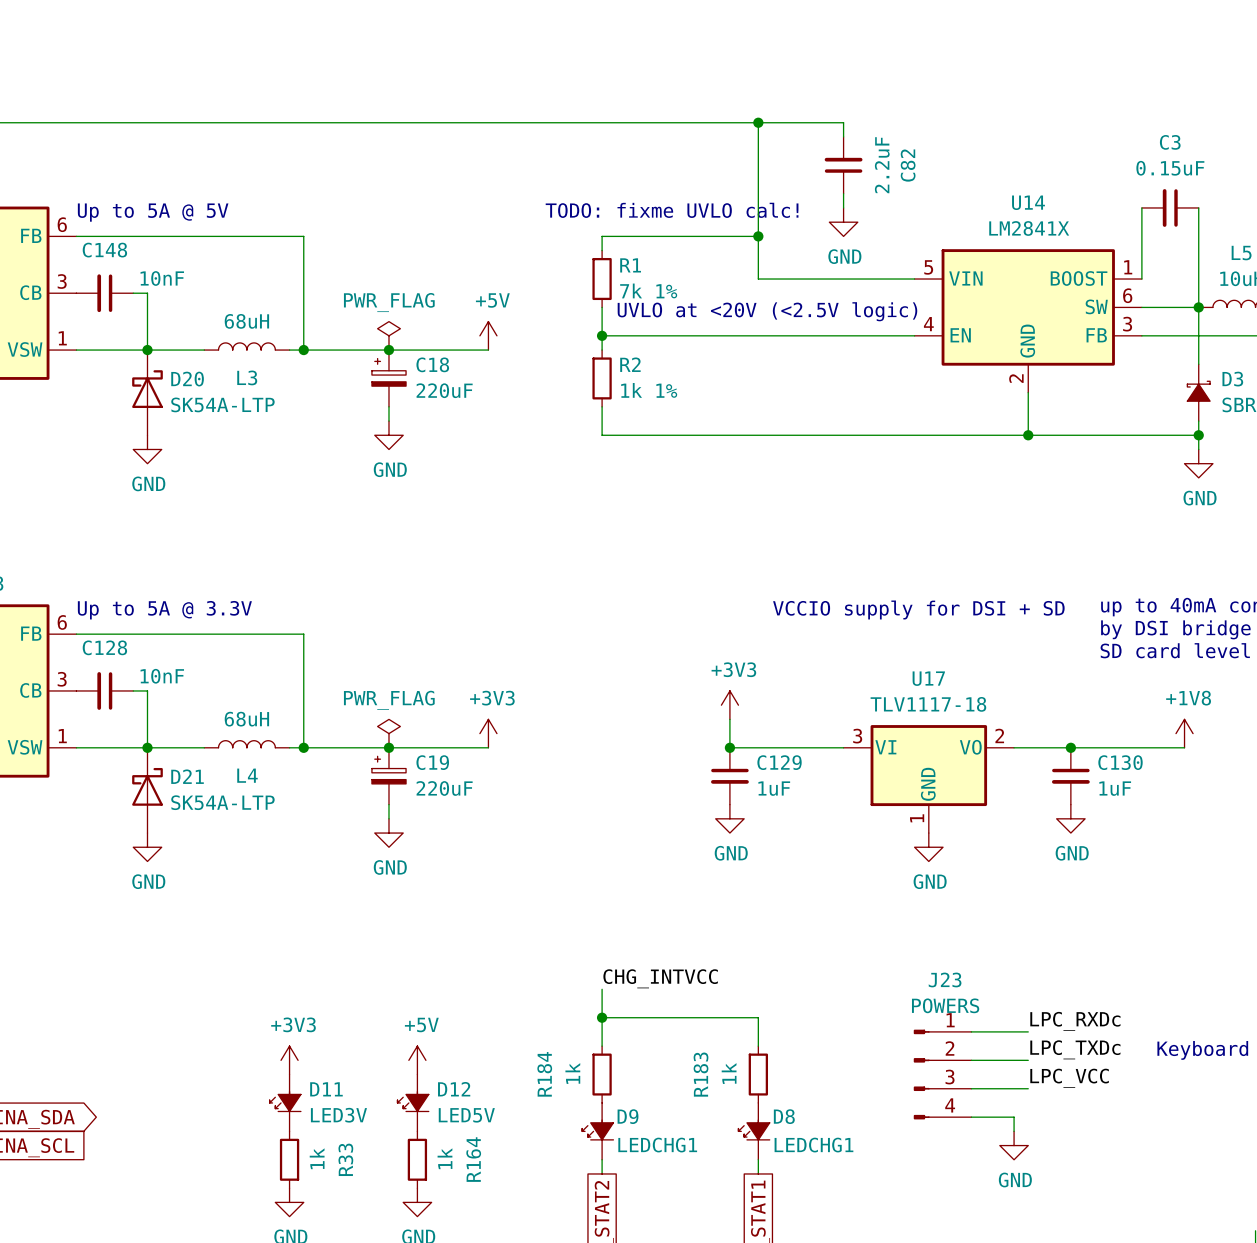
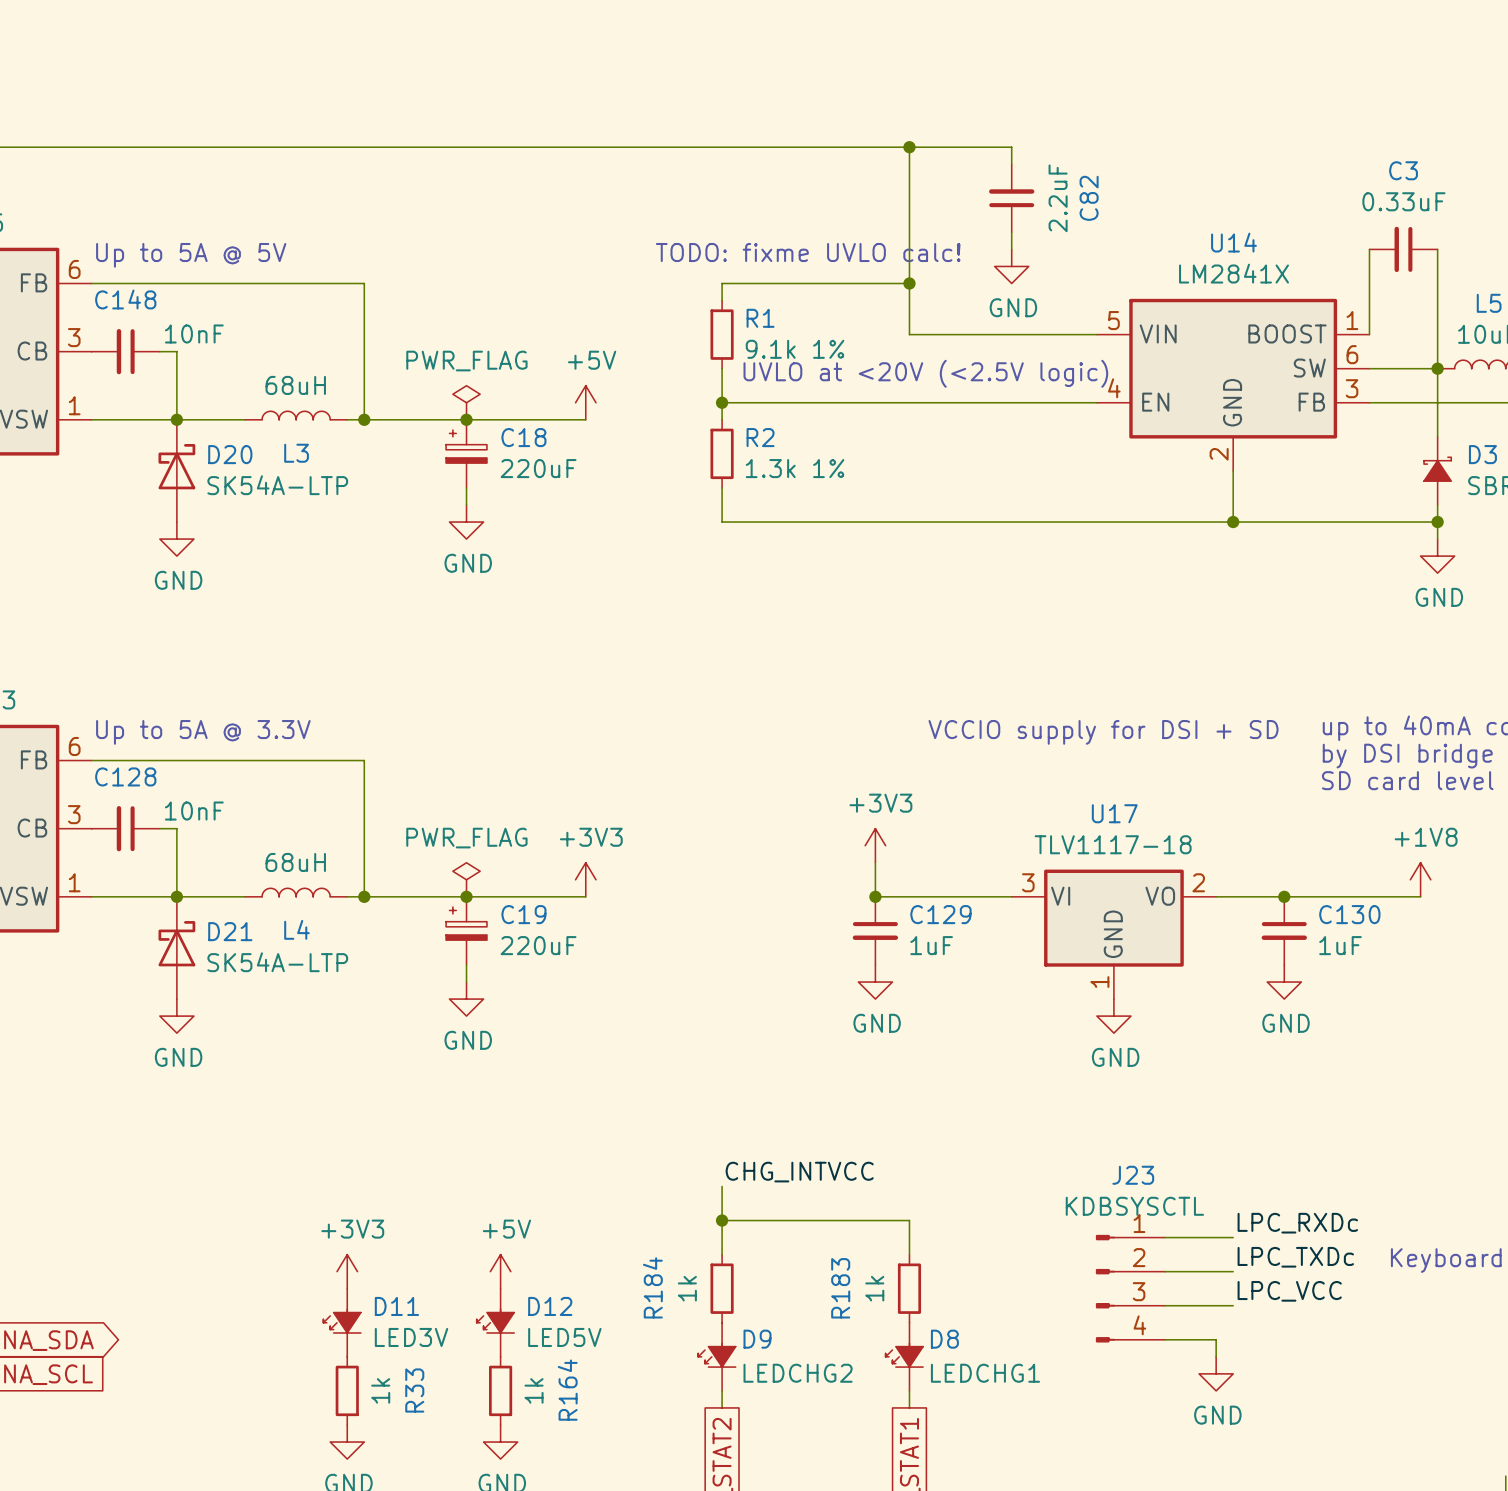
C3 value: 0.15uF (1170, 168) -> 0.33uF (1403, 201)
R1 value: 7k 1% (648, 290) -> 9.1k 1% (795, 349)
R2 value: 1k 1% (649, 390) -> 1.3k 1% (795, 468)
J23 value: POWERS (945, 1005) -> KDBSYSCTL (1134, 1206)
D9 value: LEDCHG1 (657, 1145) -> LEDCHG2 (798, 1373)

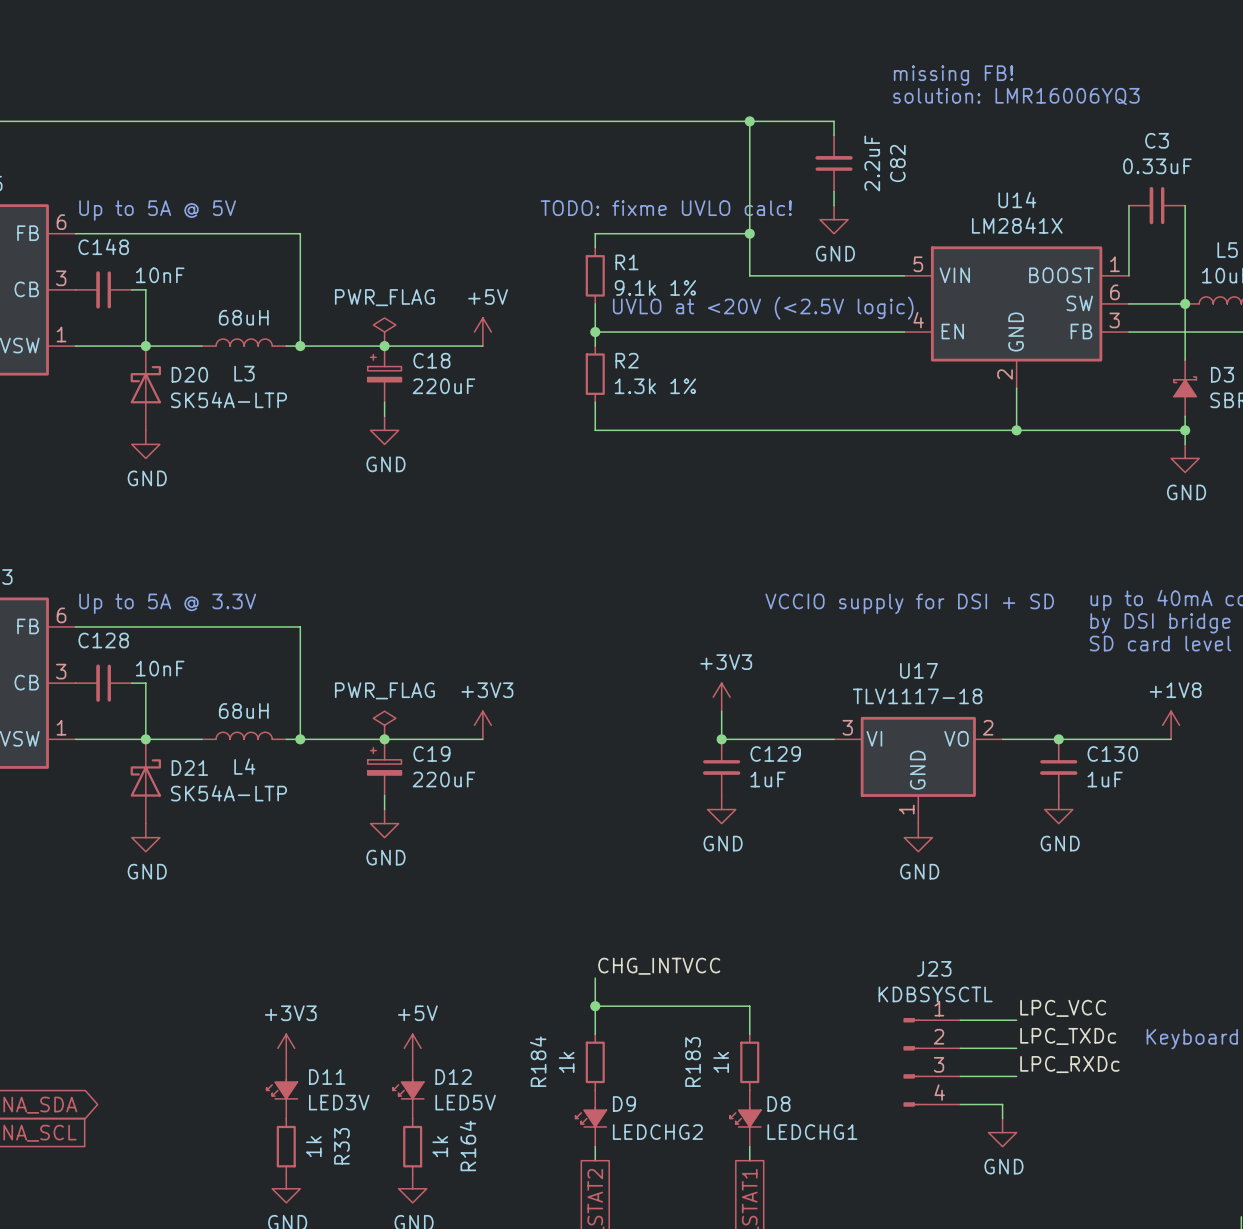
text: none -> missing FB! (953, 75)
text: none -> solution: LMR16006YQ3 (1016, 96)
label: LPC_RXDc (1297, 1223) -> LPC_VCC (1063, 1008)
label: LPC_VCC (1289, 1291) -> LPC_RXDc (1069, 1064)

